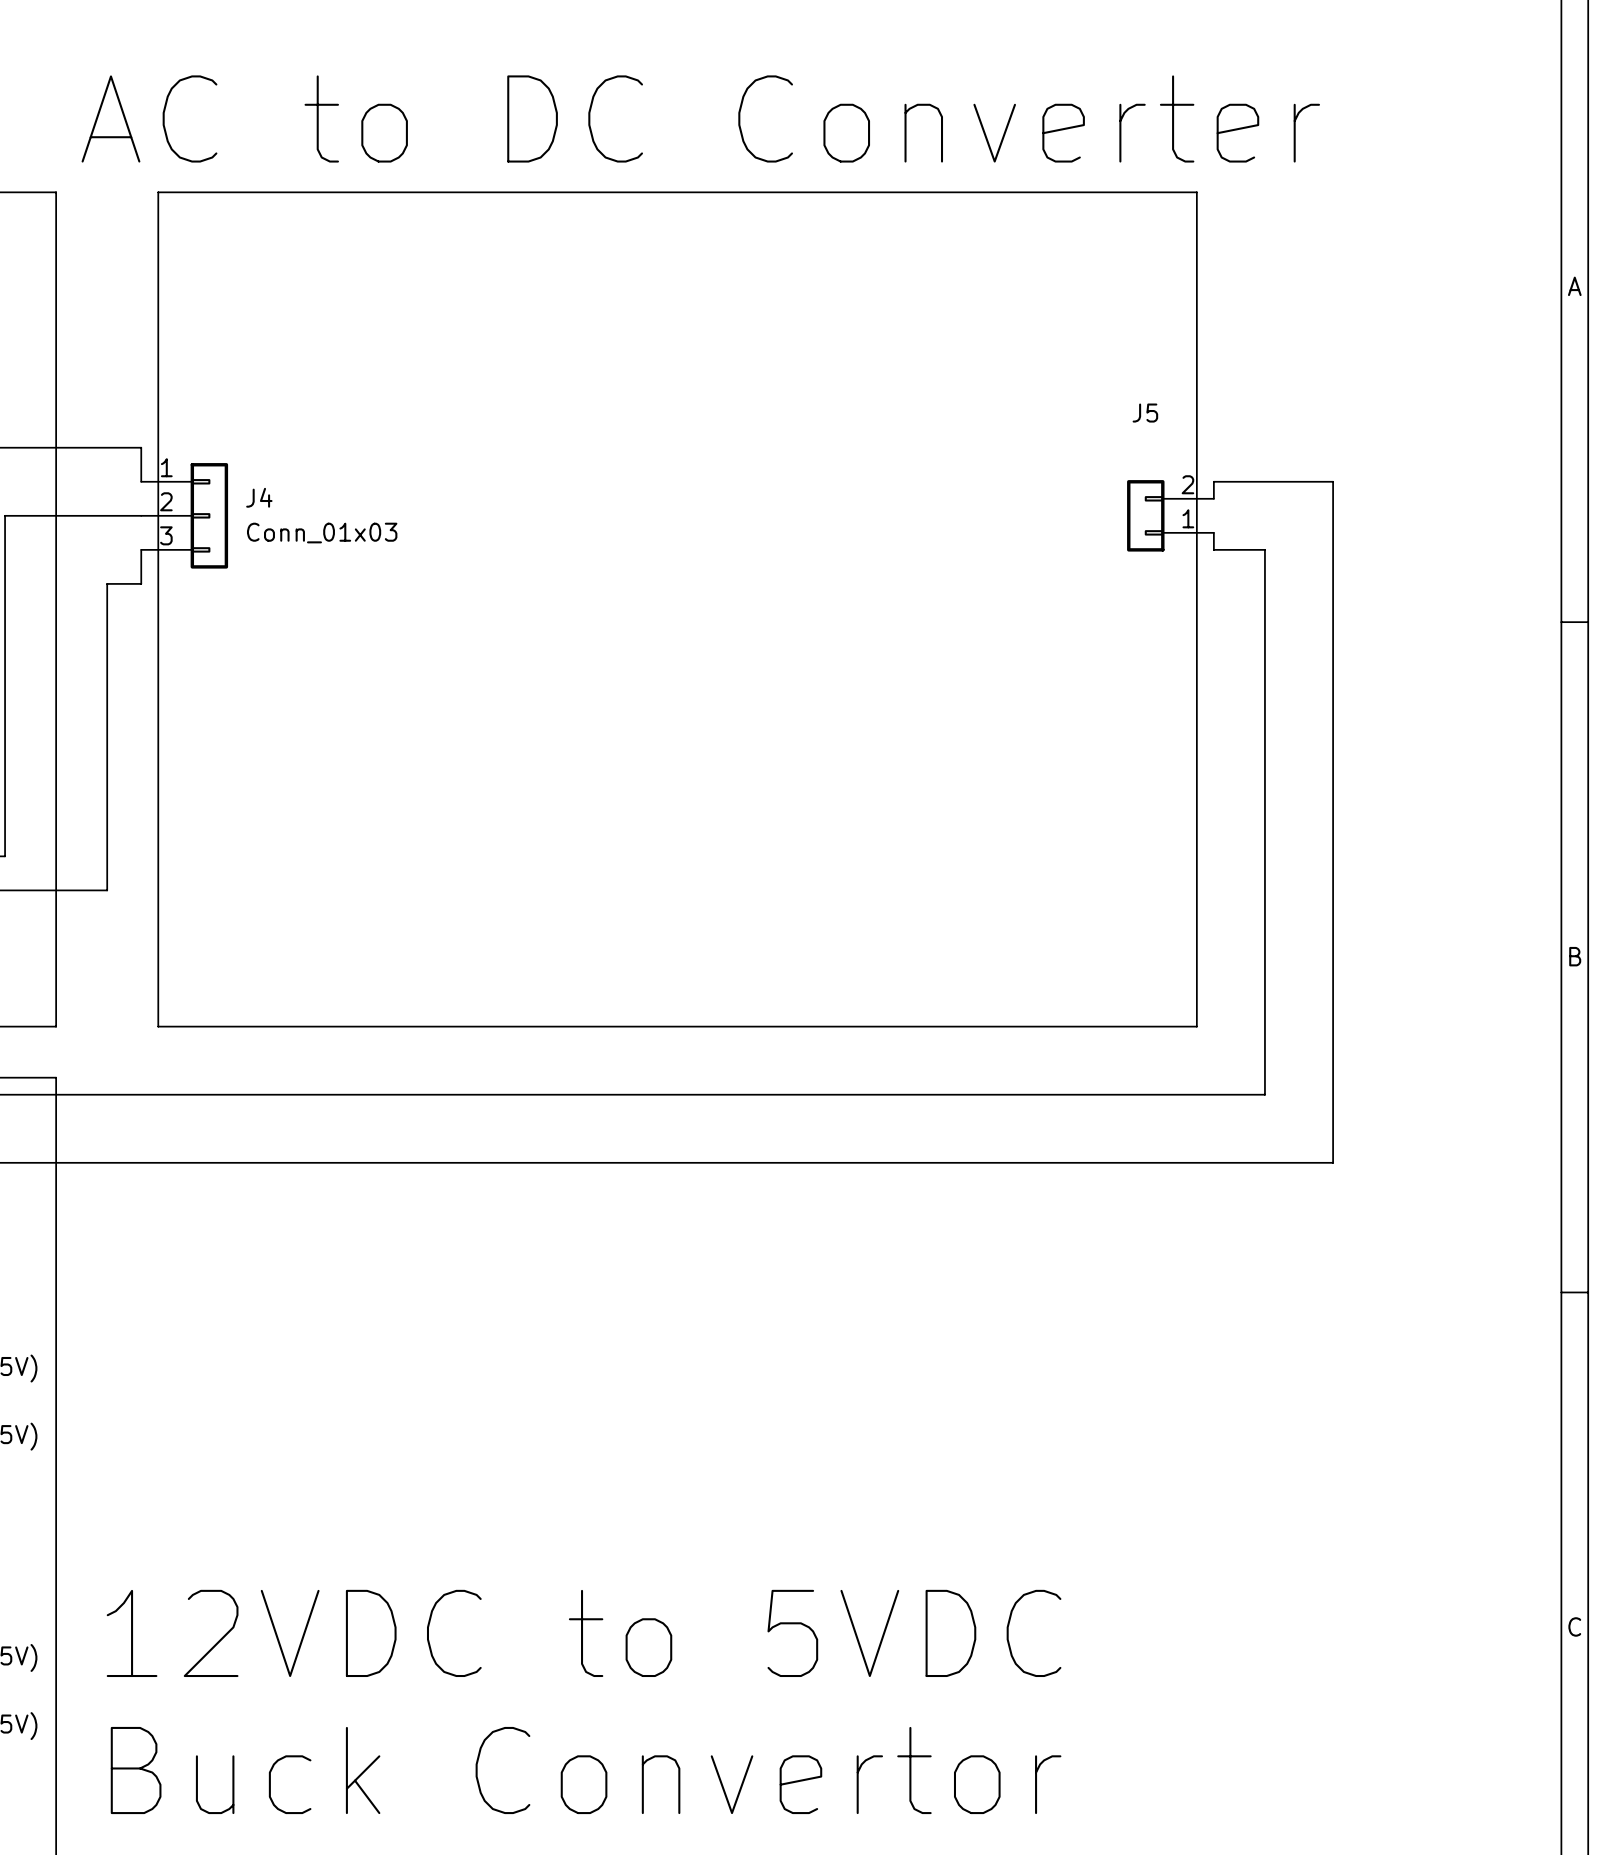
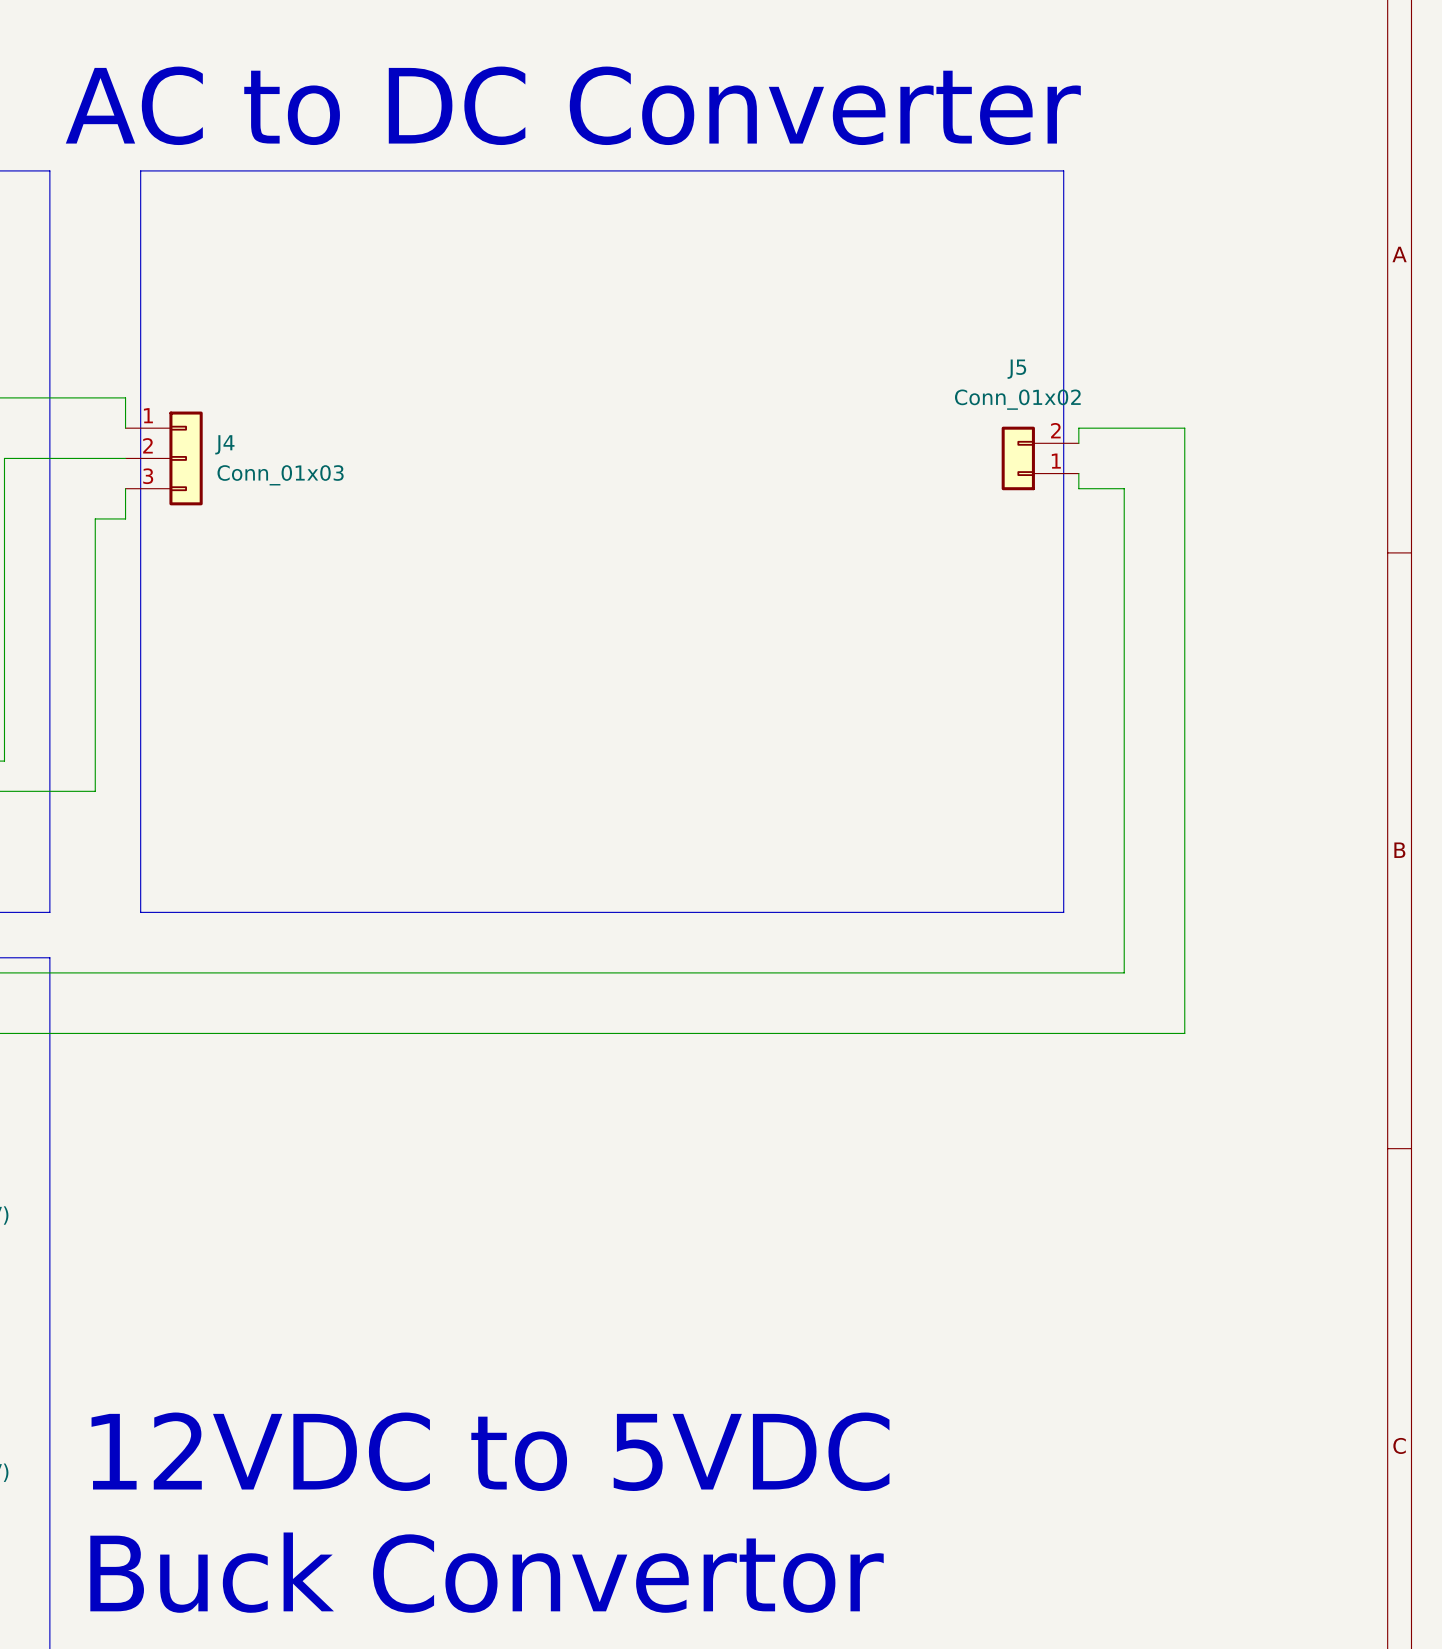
J5 value: none -> Conn_01x02 (1017, 399)

